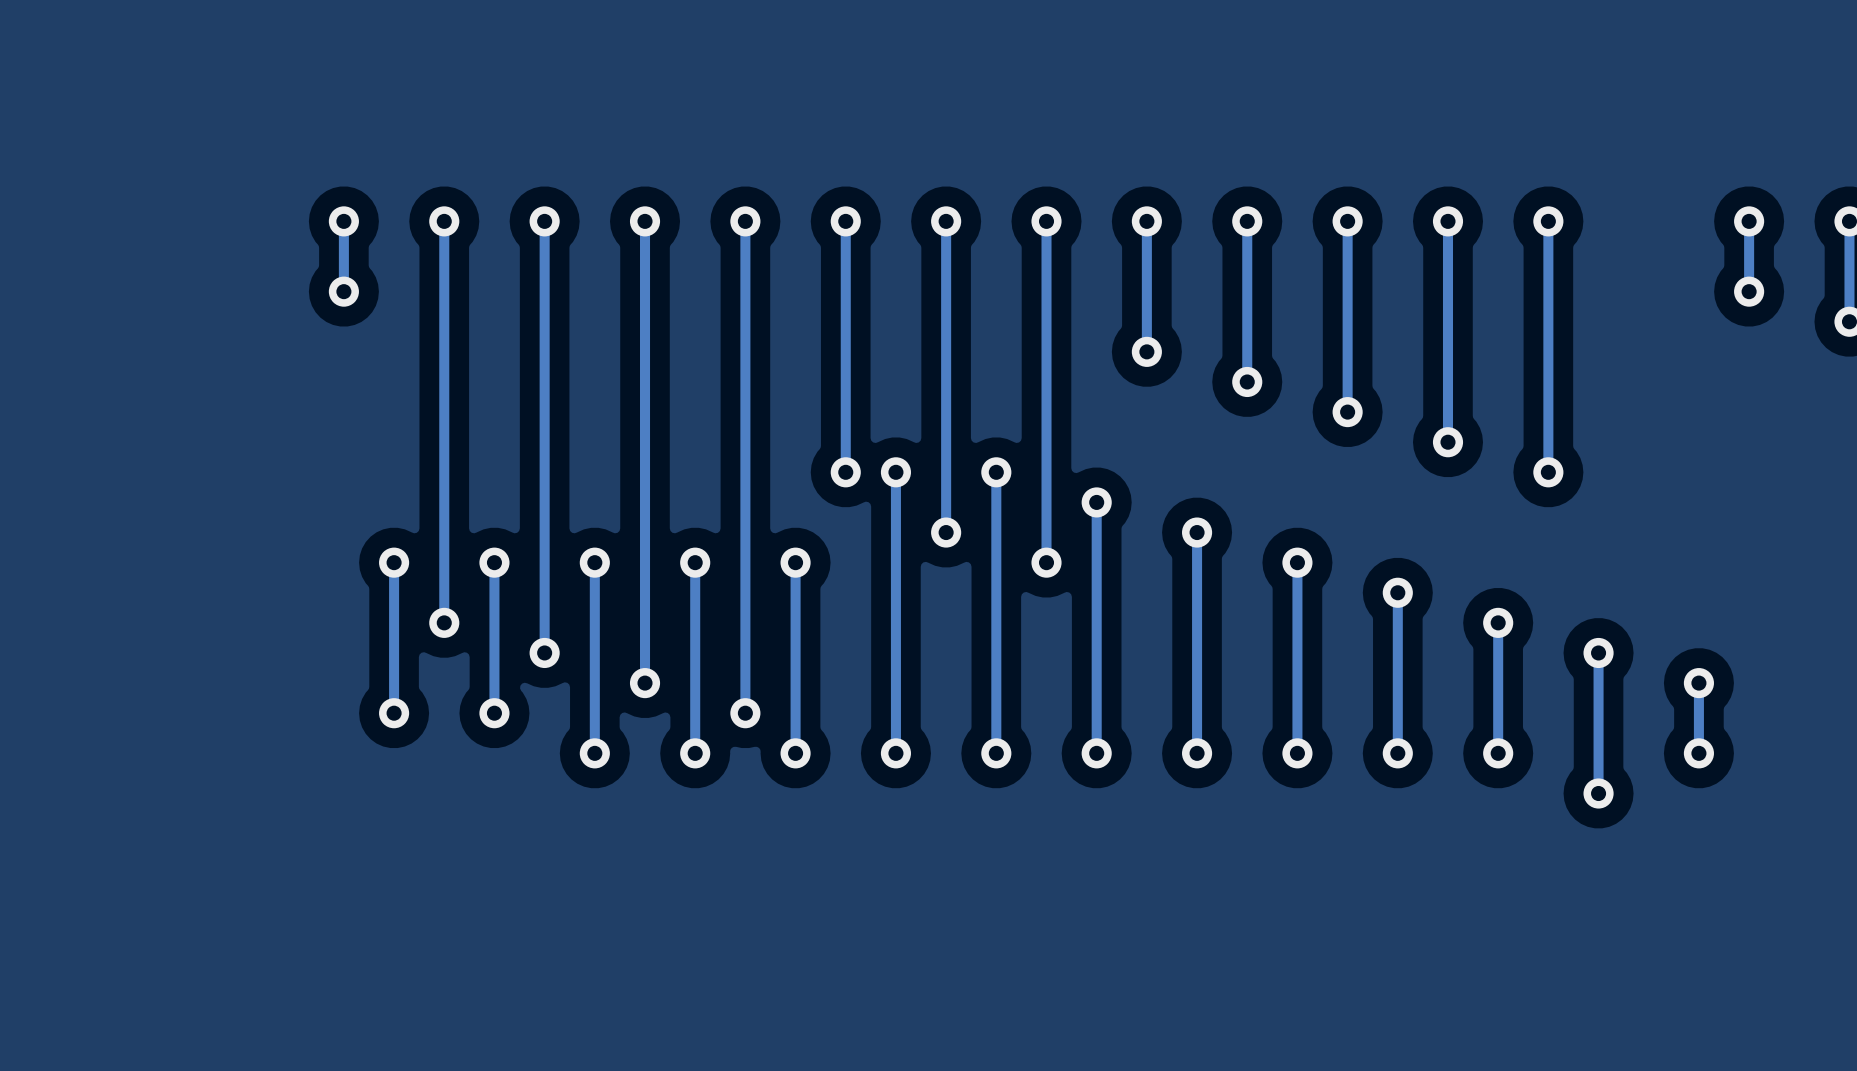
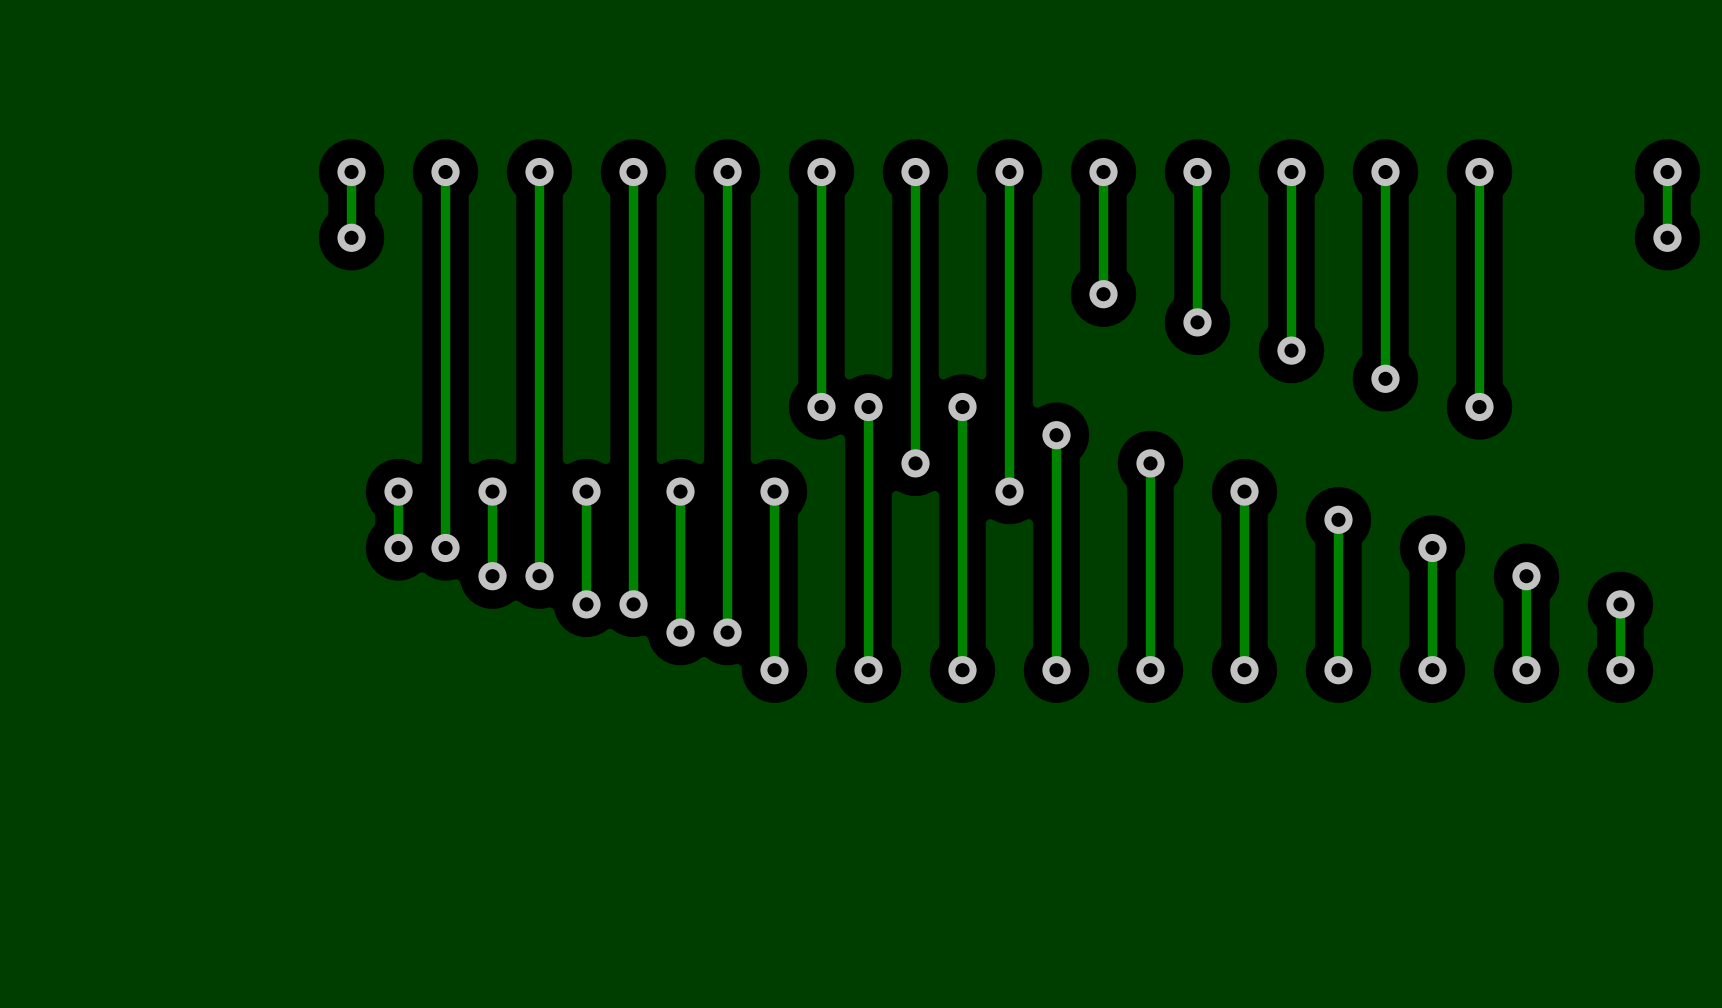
track: (394, 622) (394, 713) -> none
via: none -> (398, 547)
track: (494, 652) (494, 713) -> none
via: none -> (492, 576)
track: (594, 683) (594, 753) -> none
via: none -> (586, 604)
via: (394, 713) -> none
via: (494, 713) -> none
track: (695, 713) (695, 753) -> none
via: (594, 753) -> none
via position: (695, 753) -> (680, 632)
track: (1598, 753) (1598, 793) -> none
via position: (1598, 793) -> (1526, 670)

